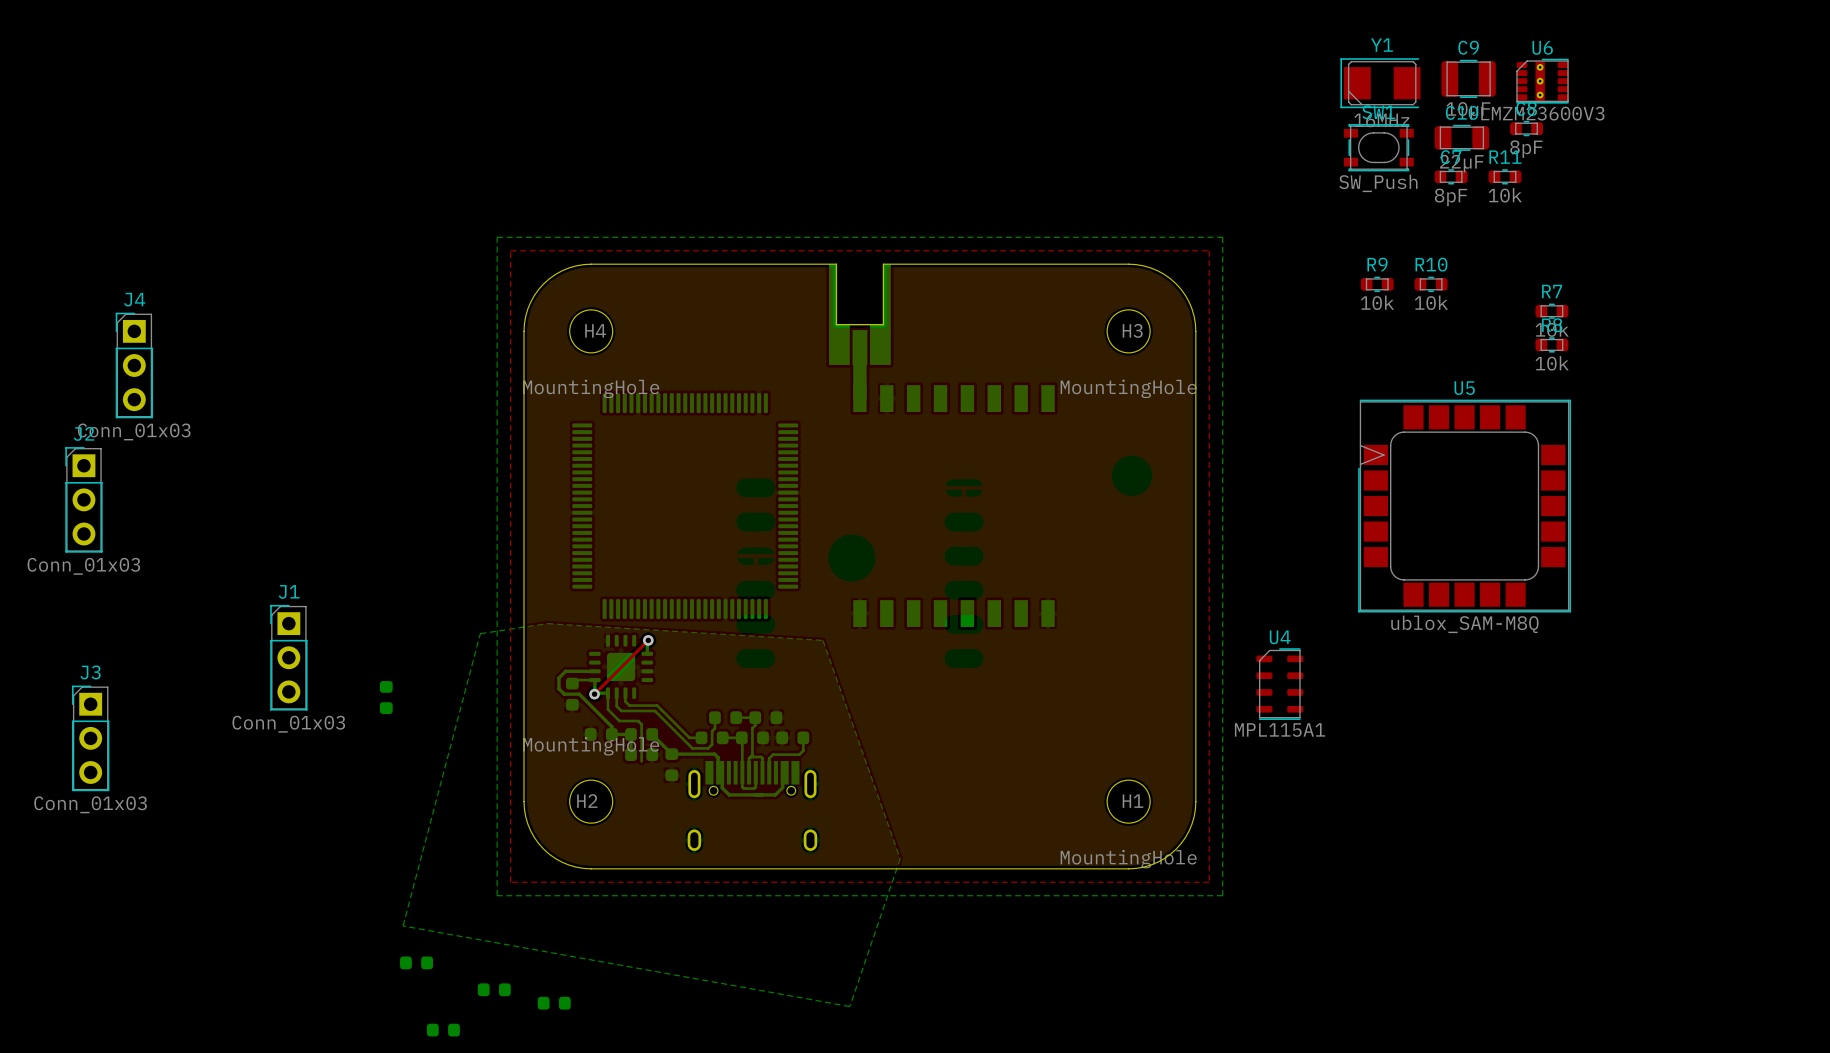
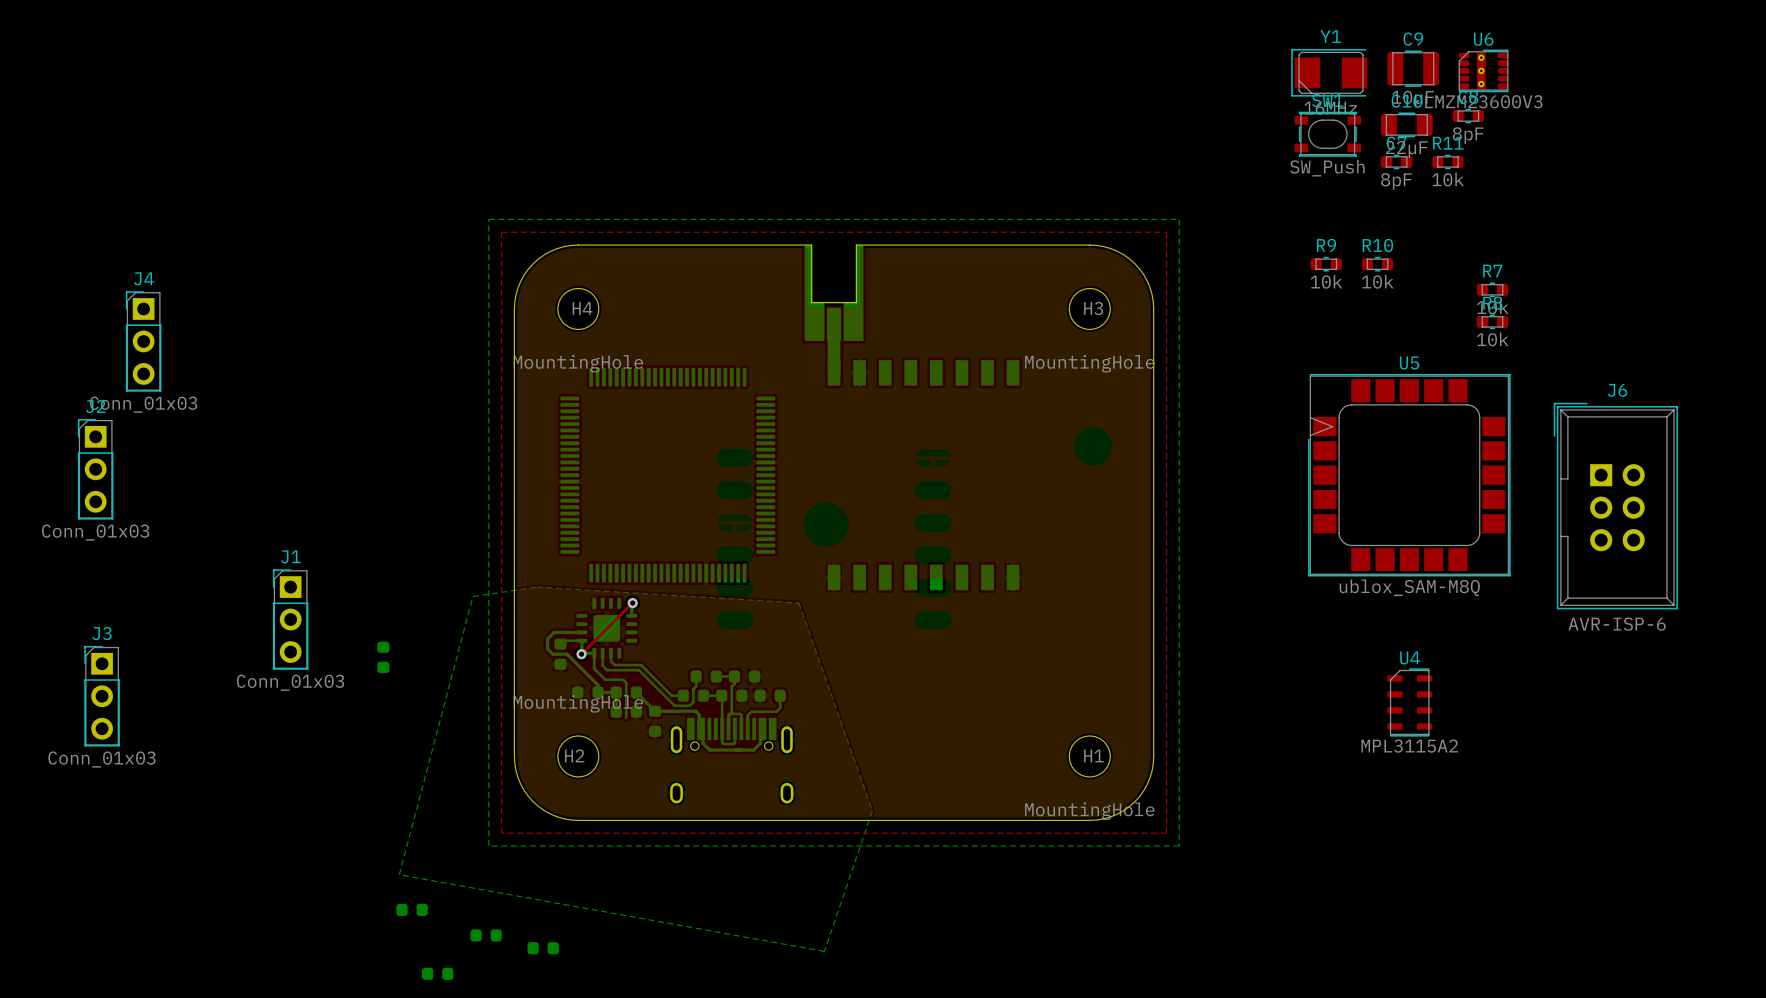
J6: none -> AVR-ISP-6 (1615, 506)
U4 position: (1279, 684) -> (1409, 702)
U4 value: MPL115A1 (1280, 730) -> MPL3115A2 (1409, 746)

